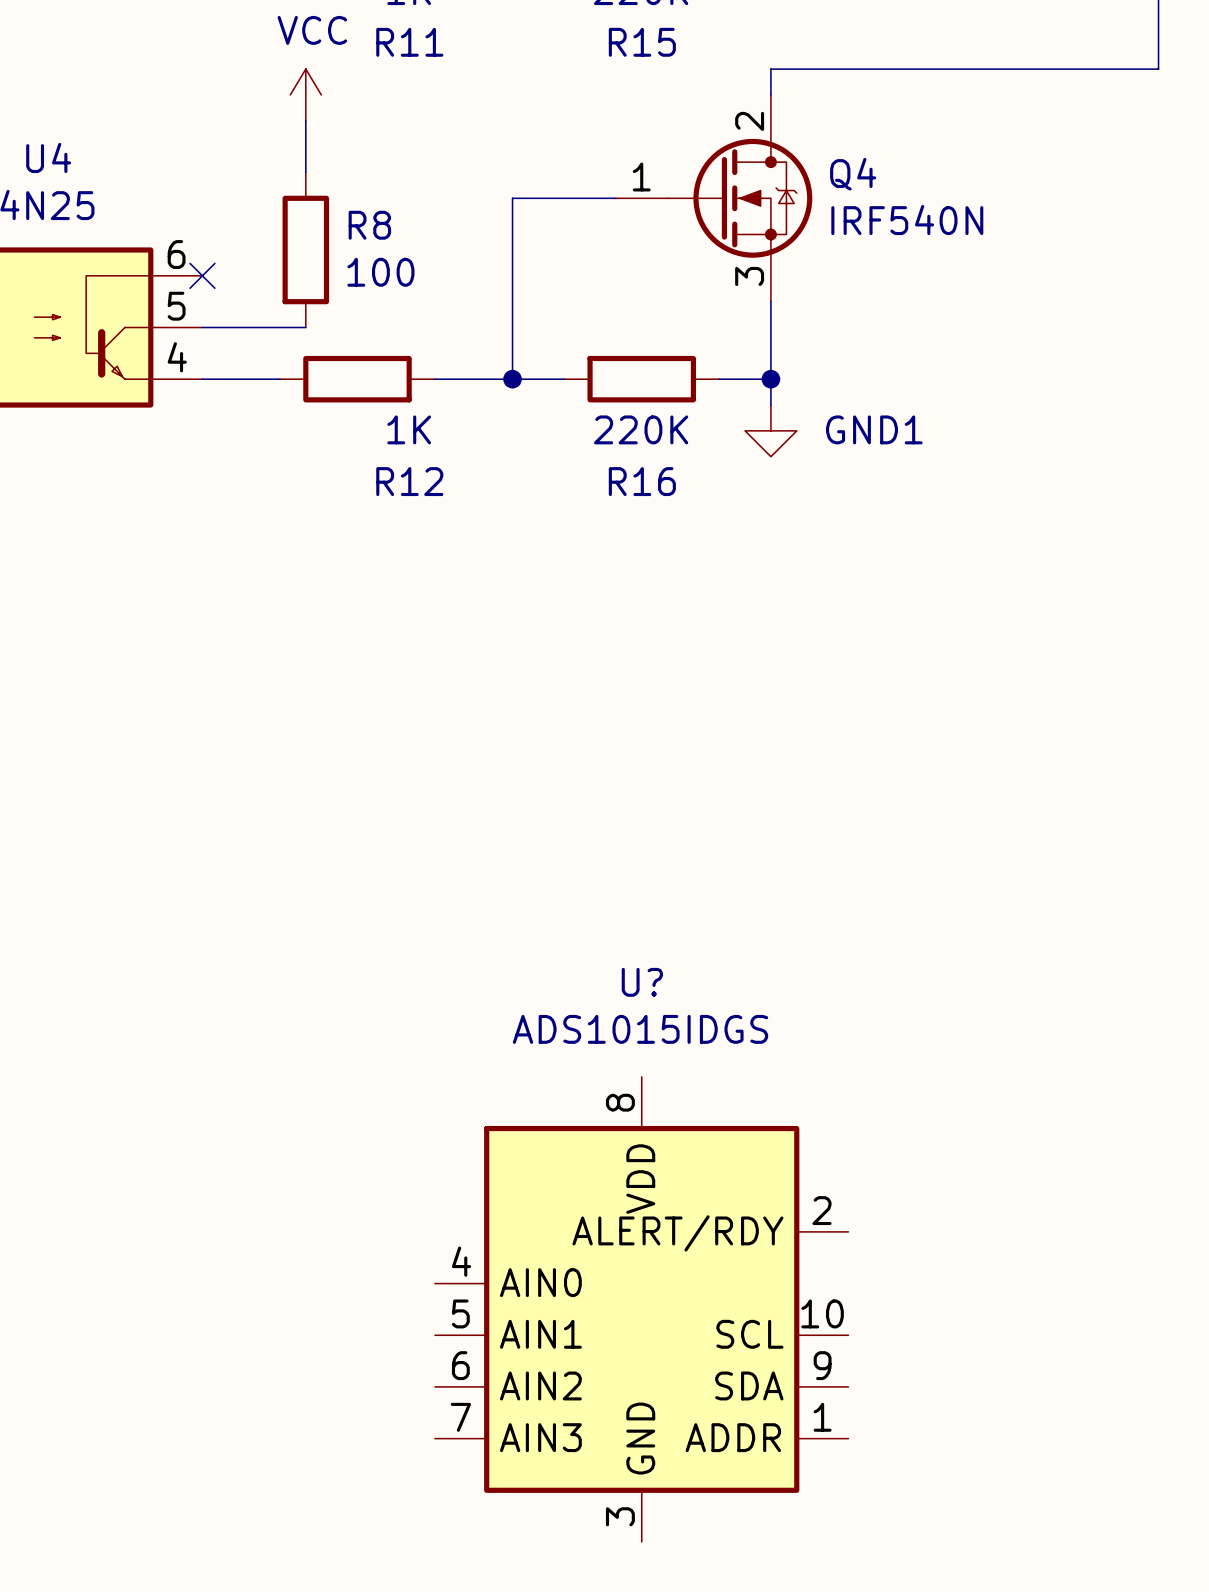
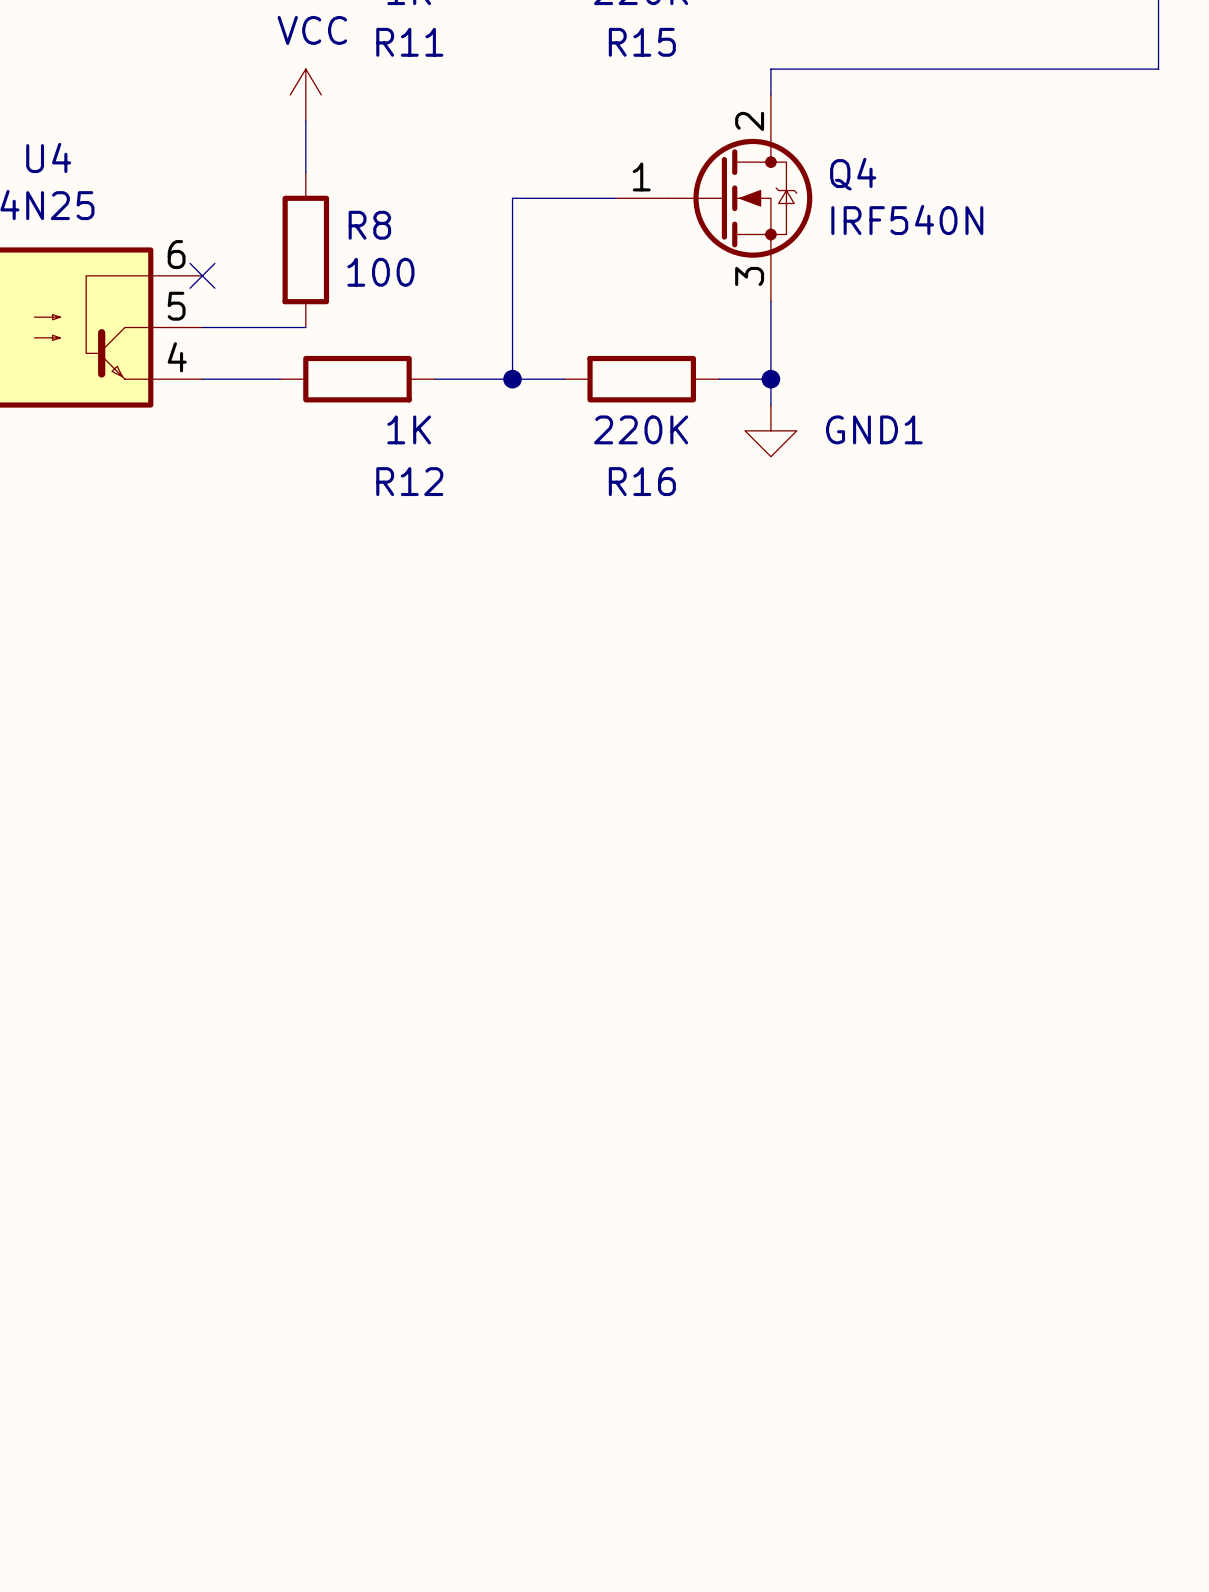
U?: ADS1015IDGS (641, 1309) -> none

